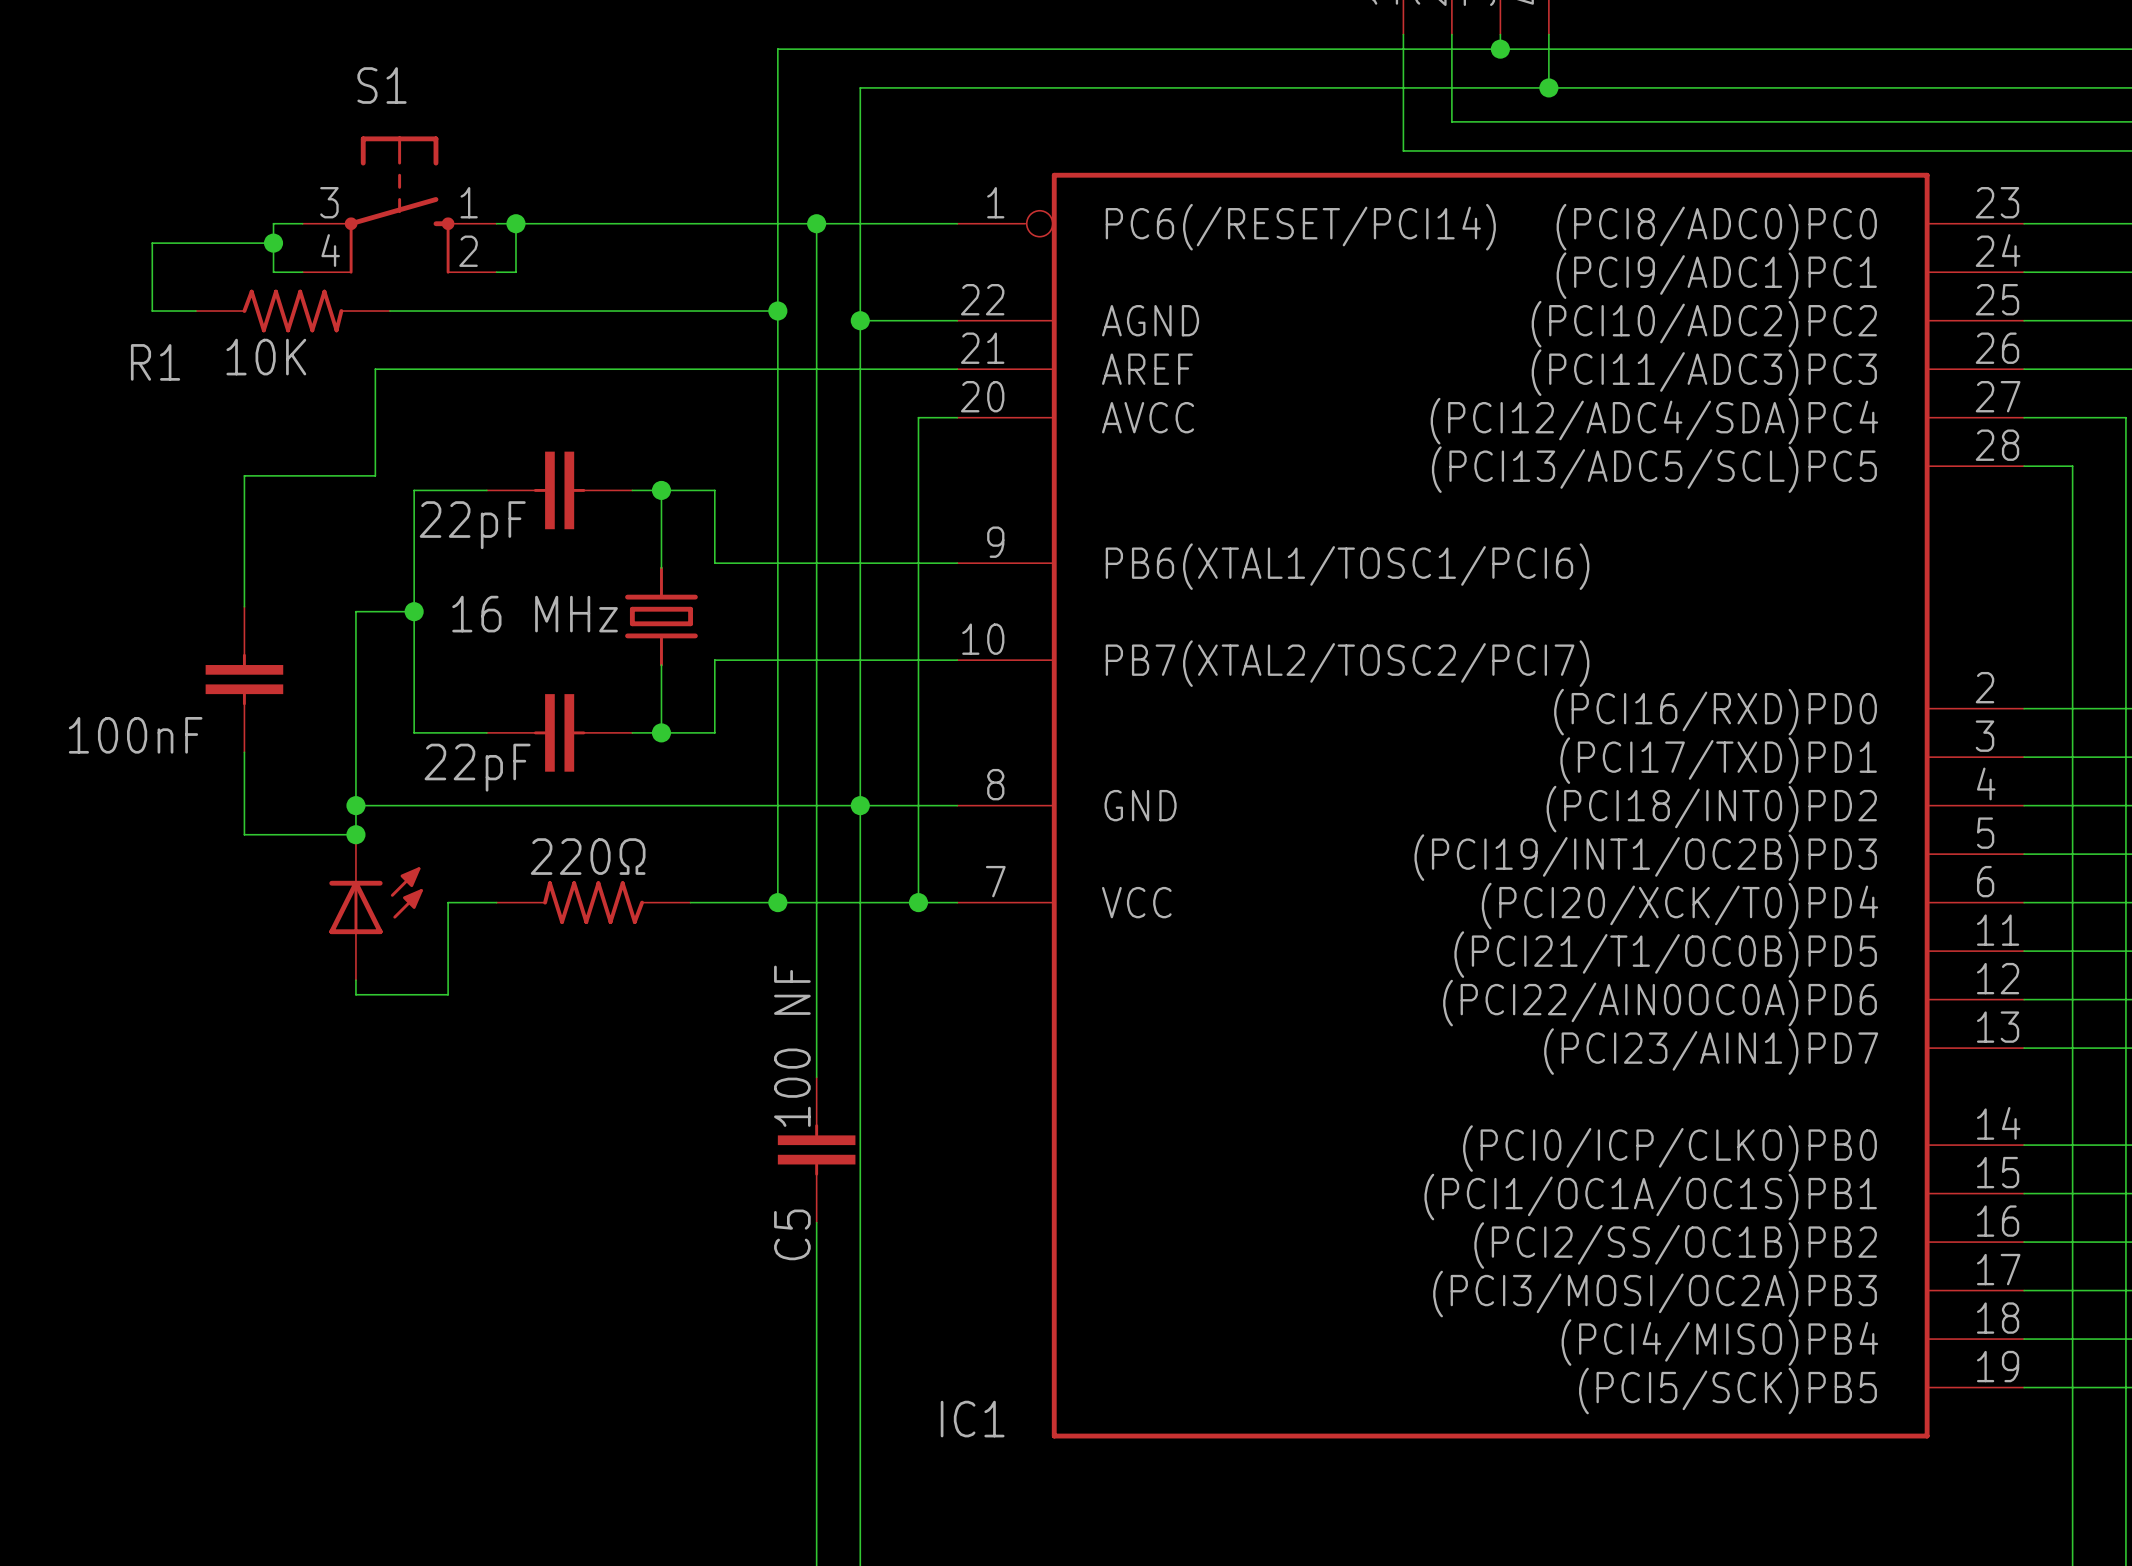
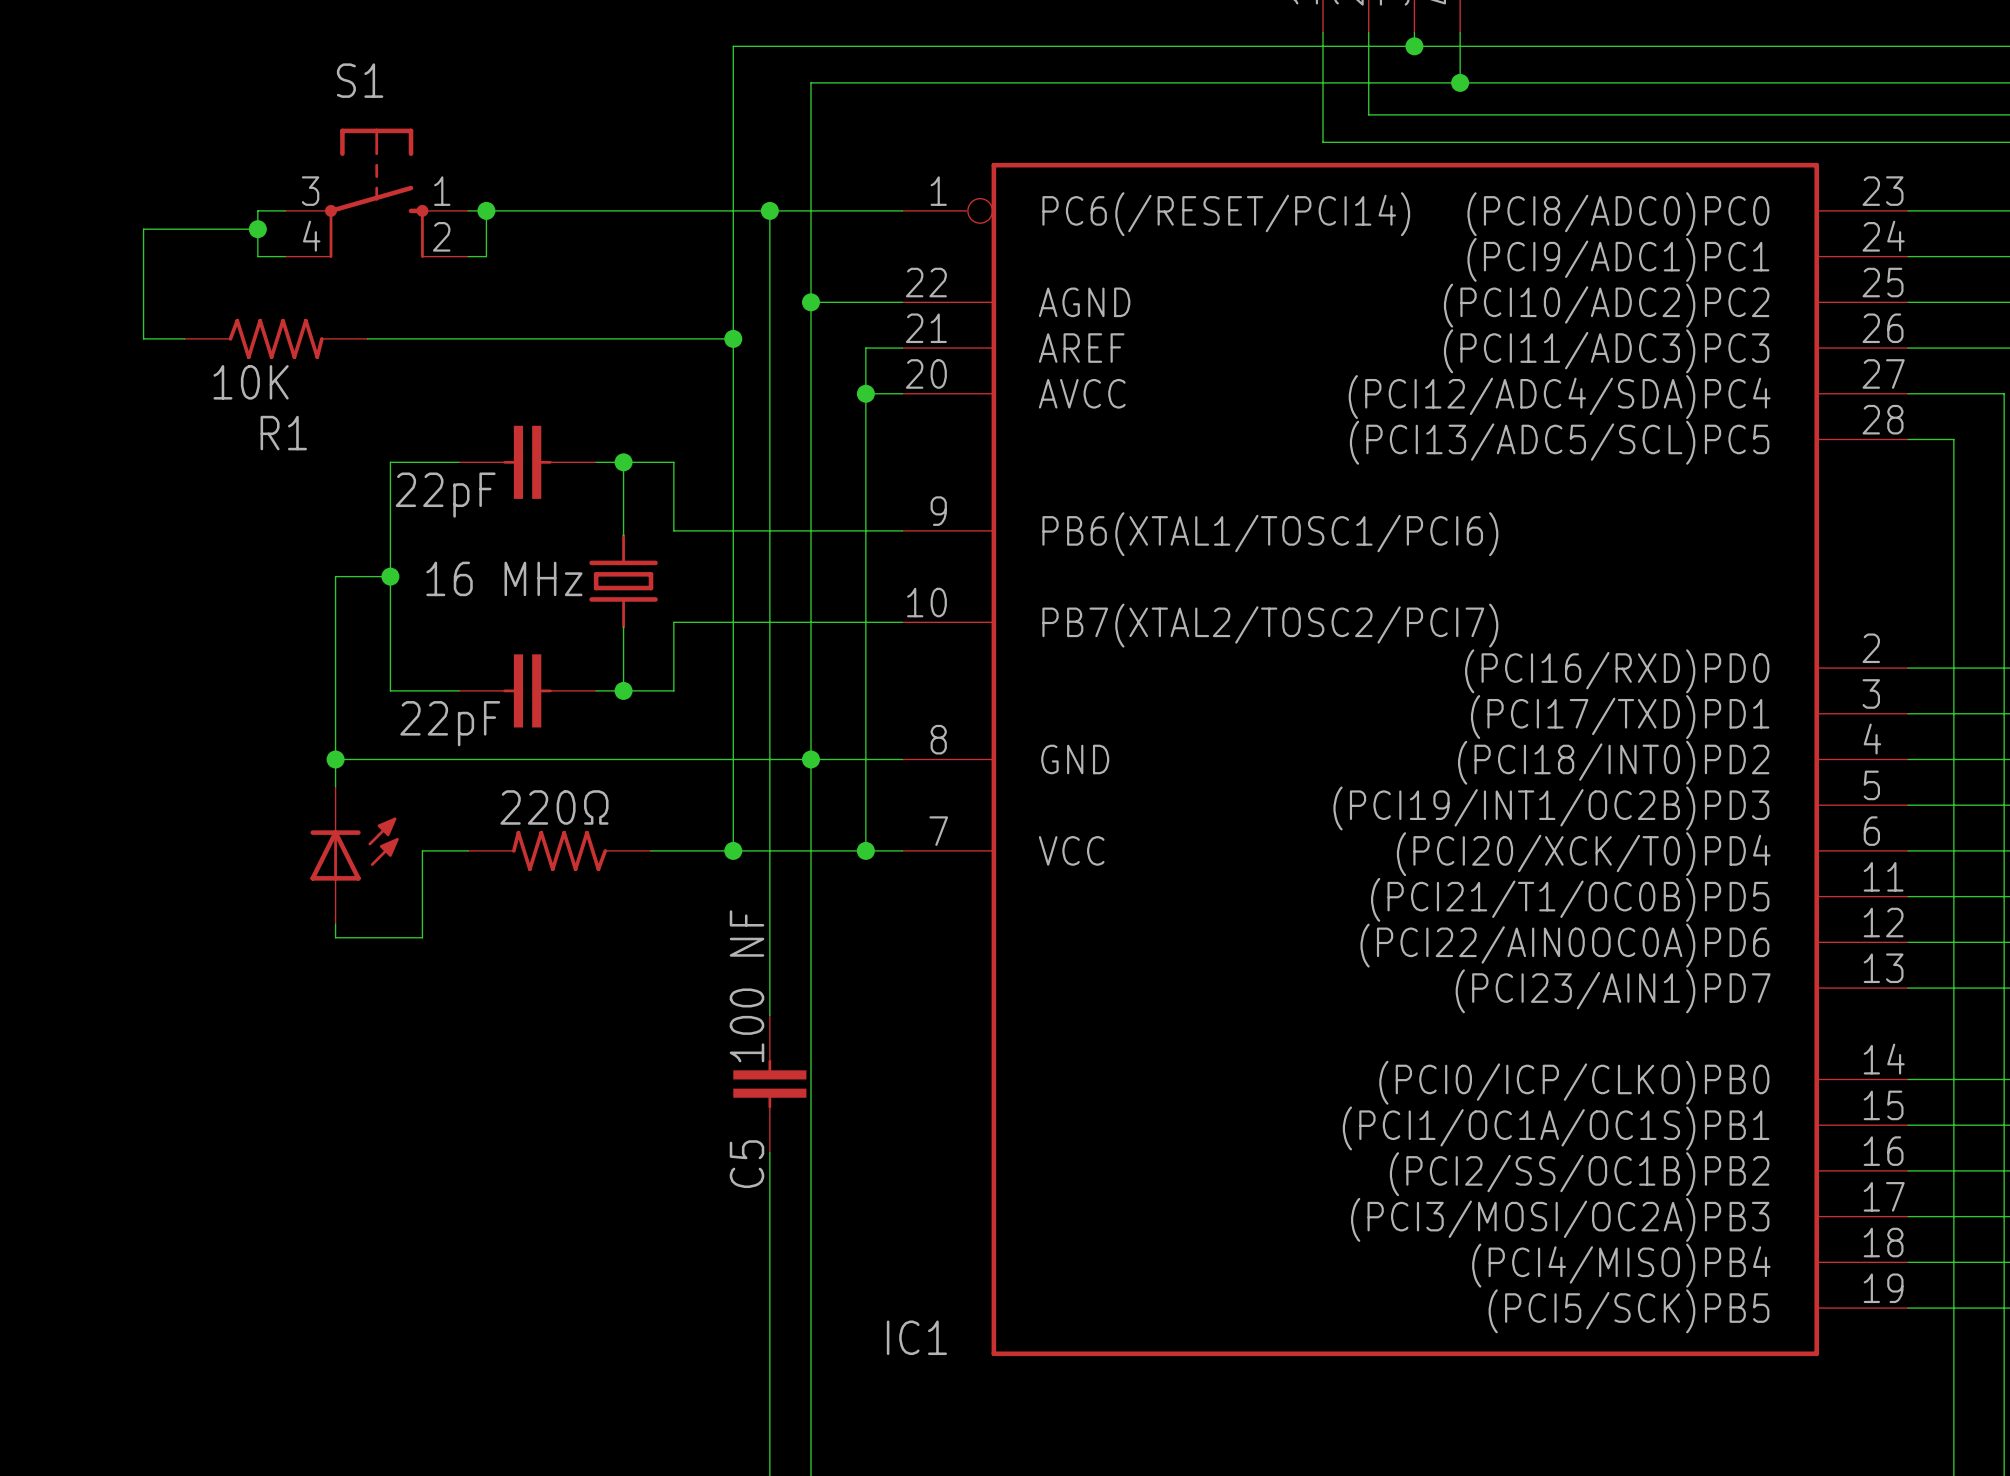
wire: (152, 311) (195, 311) -> (143, 293) (143, 338) (184, 338)
R1 position: (292, 311) -> (276, 338)
wire: (389, 311) (777, 311) -> (367, 338) (733, 338)
junction position: (777, 311) -> (733, 338)
R1 name position: R1 (155, 362) -> R1 (283, 433)
wire: (918, 369) (375, 369) (375, 475) (244, 475) (244, 606) -> (865, 348) (865, 393)
junction: none -> (865, 393)
part: 100nF (244, 679) -> none
wire: (244, 752) (244, 834) (355, 834) -> none
junction: (355, 834) -> none

